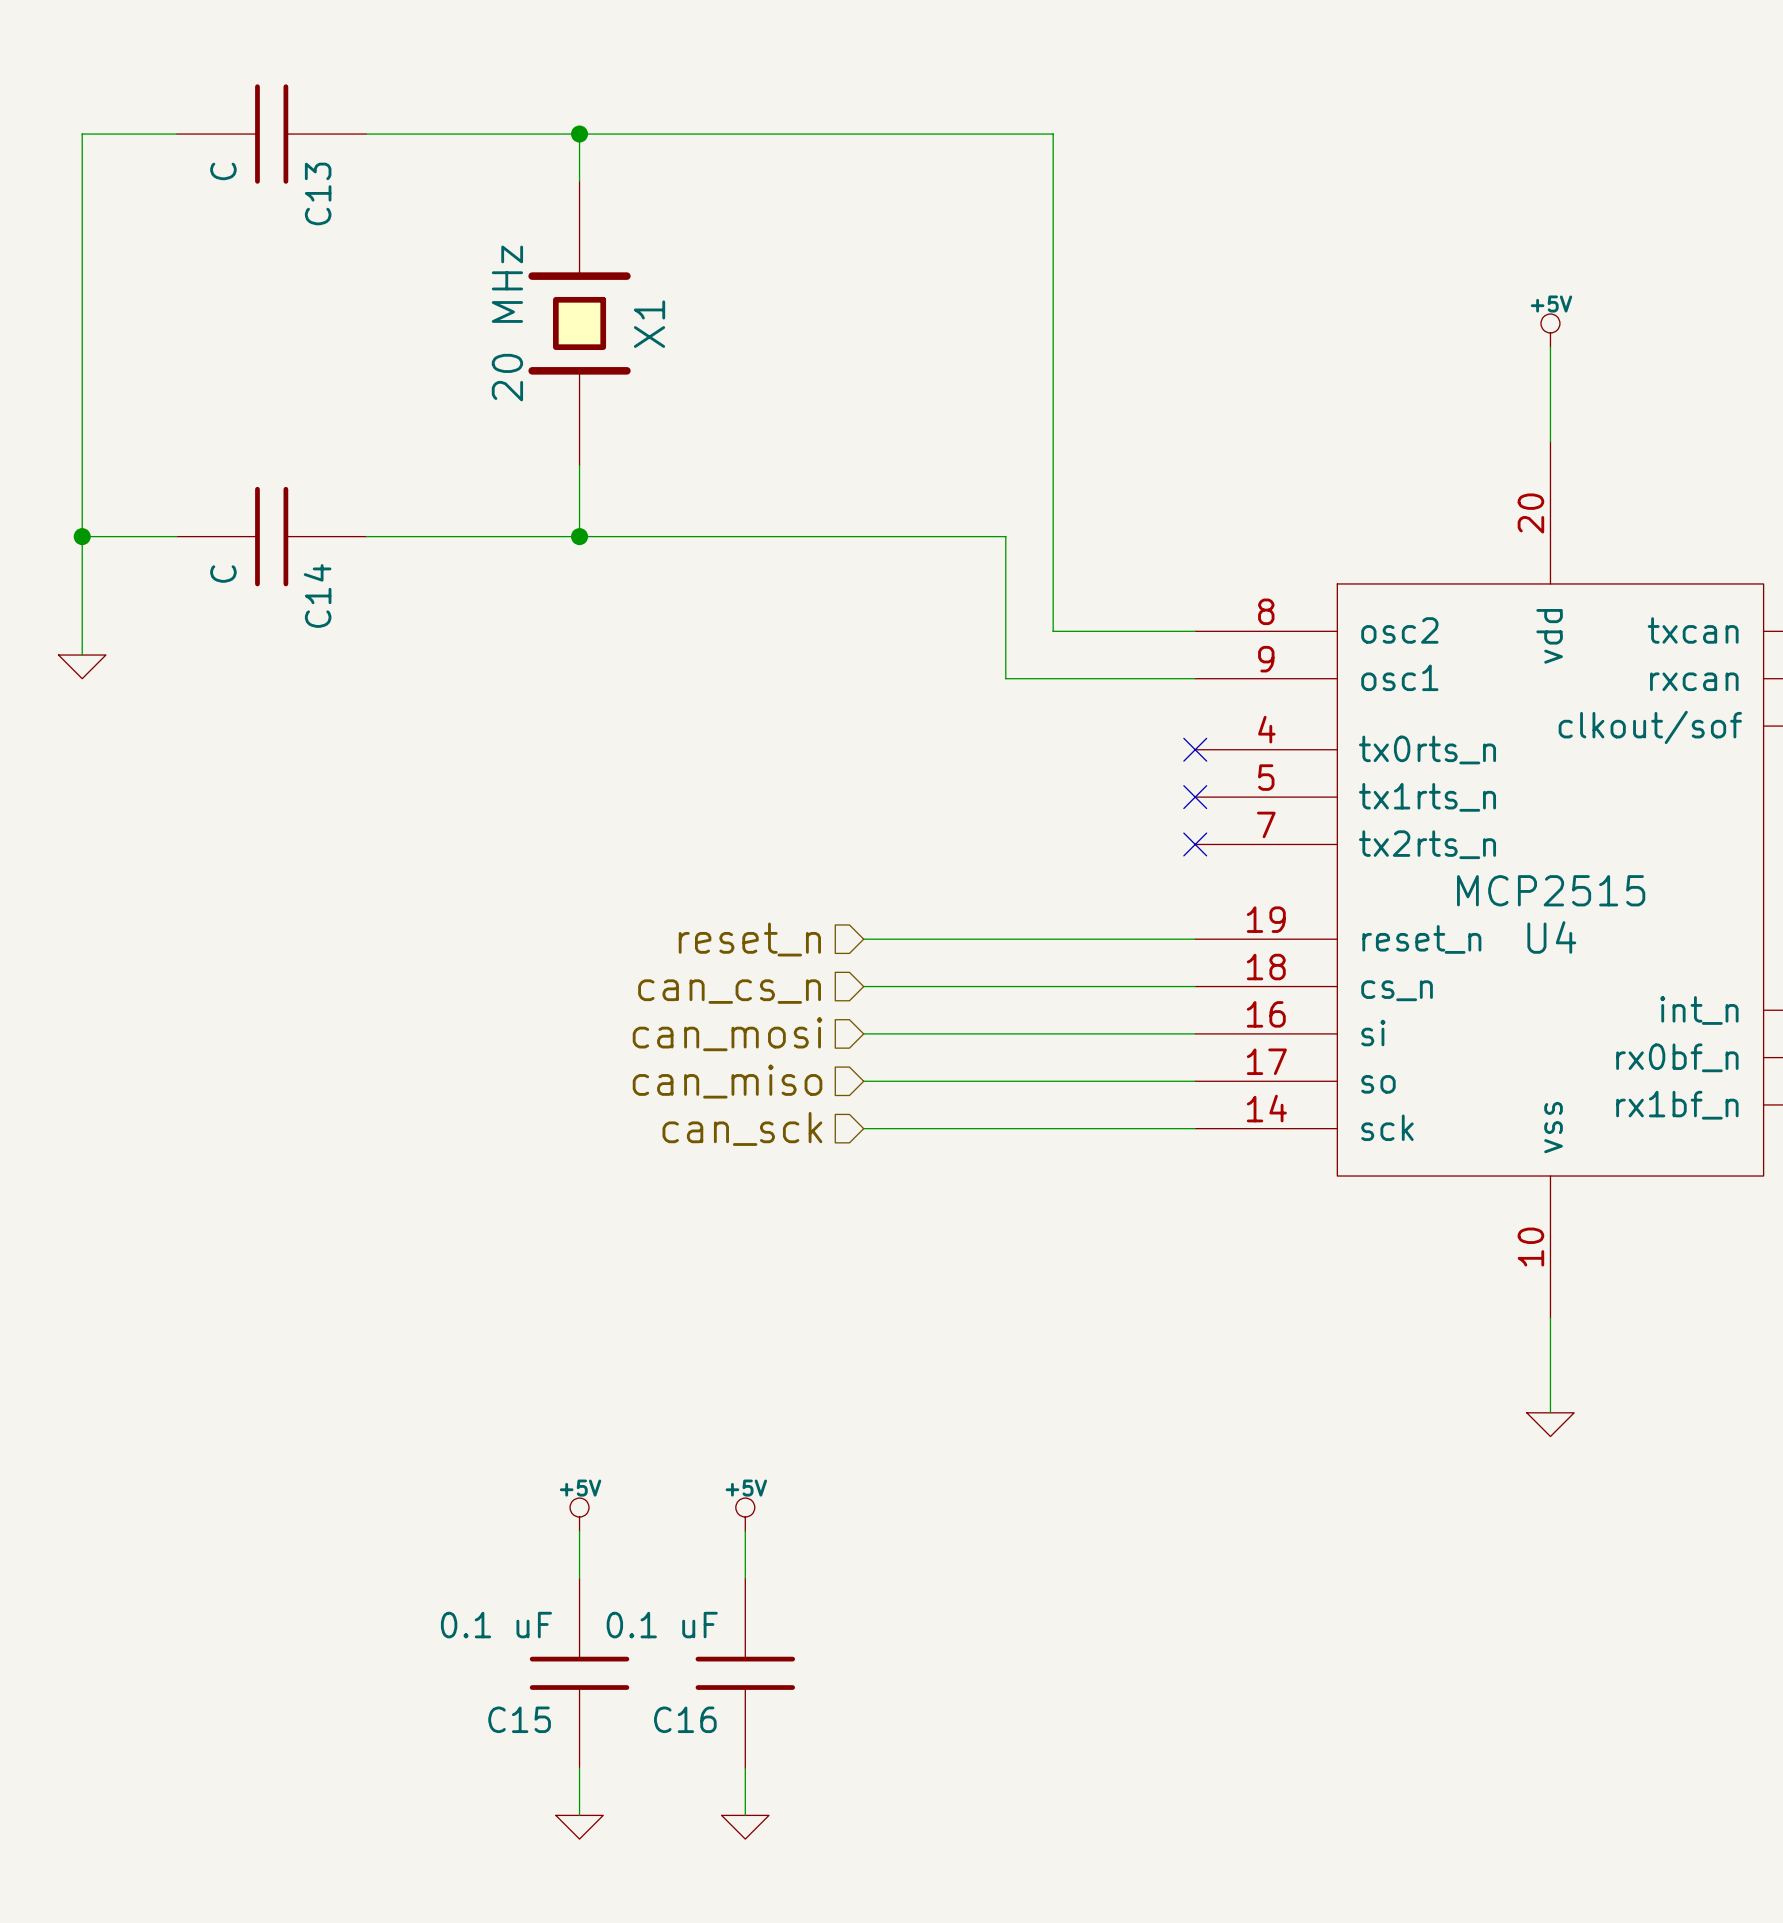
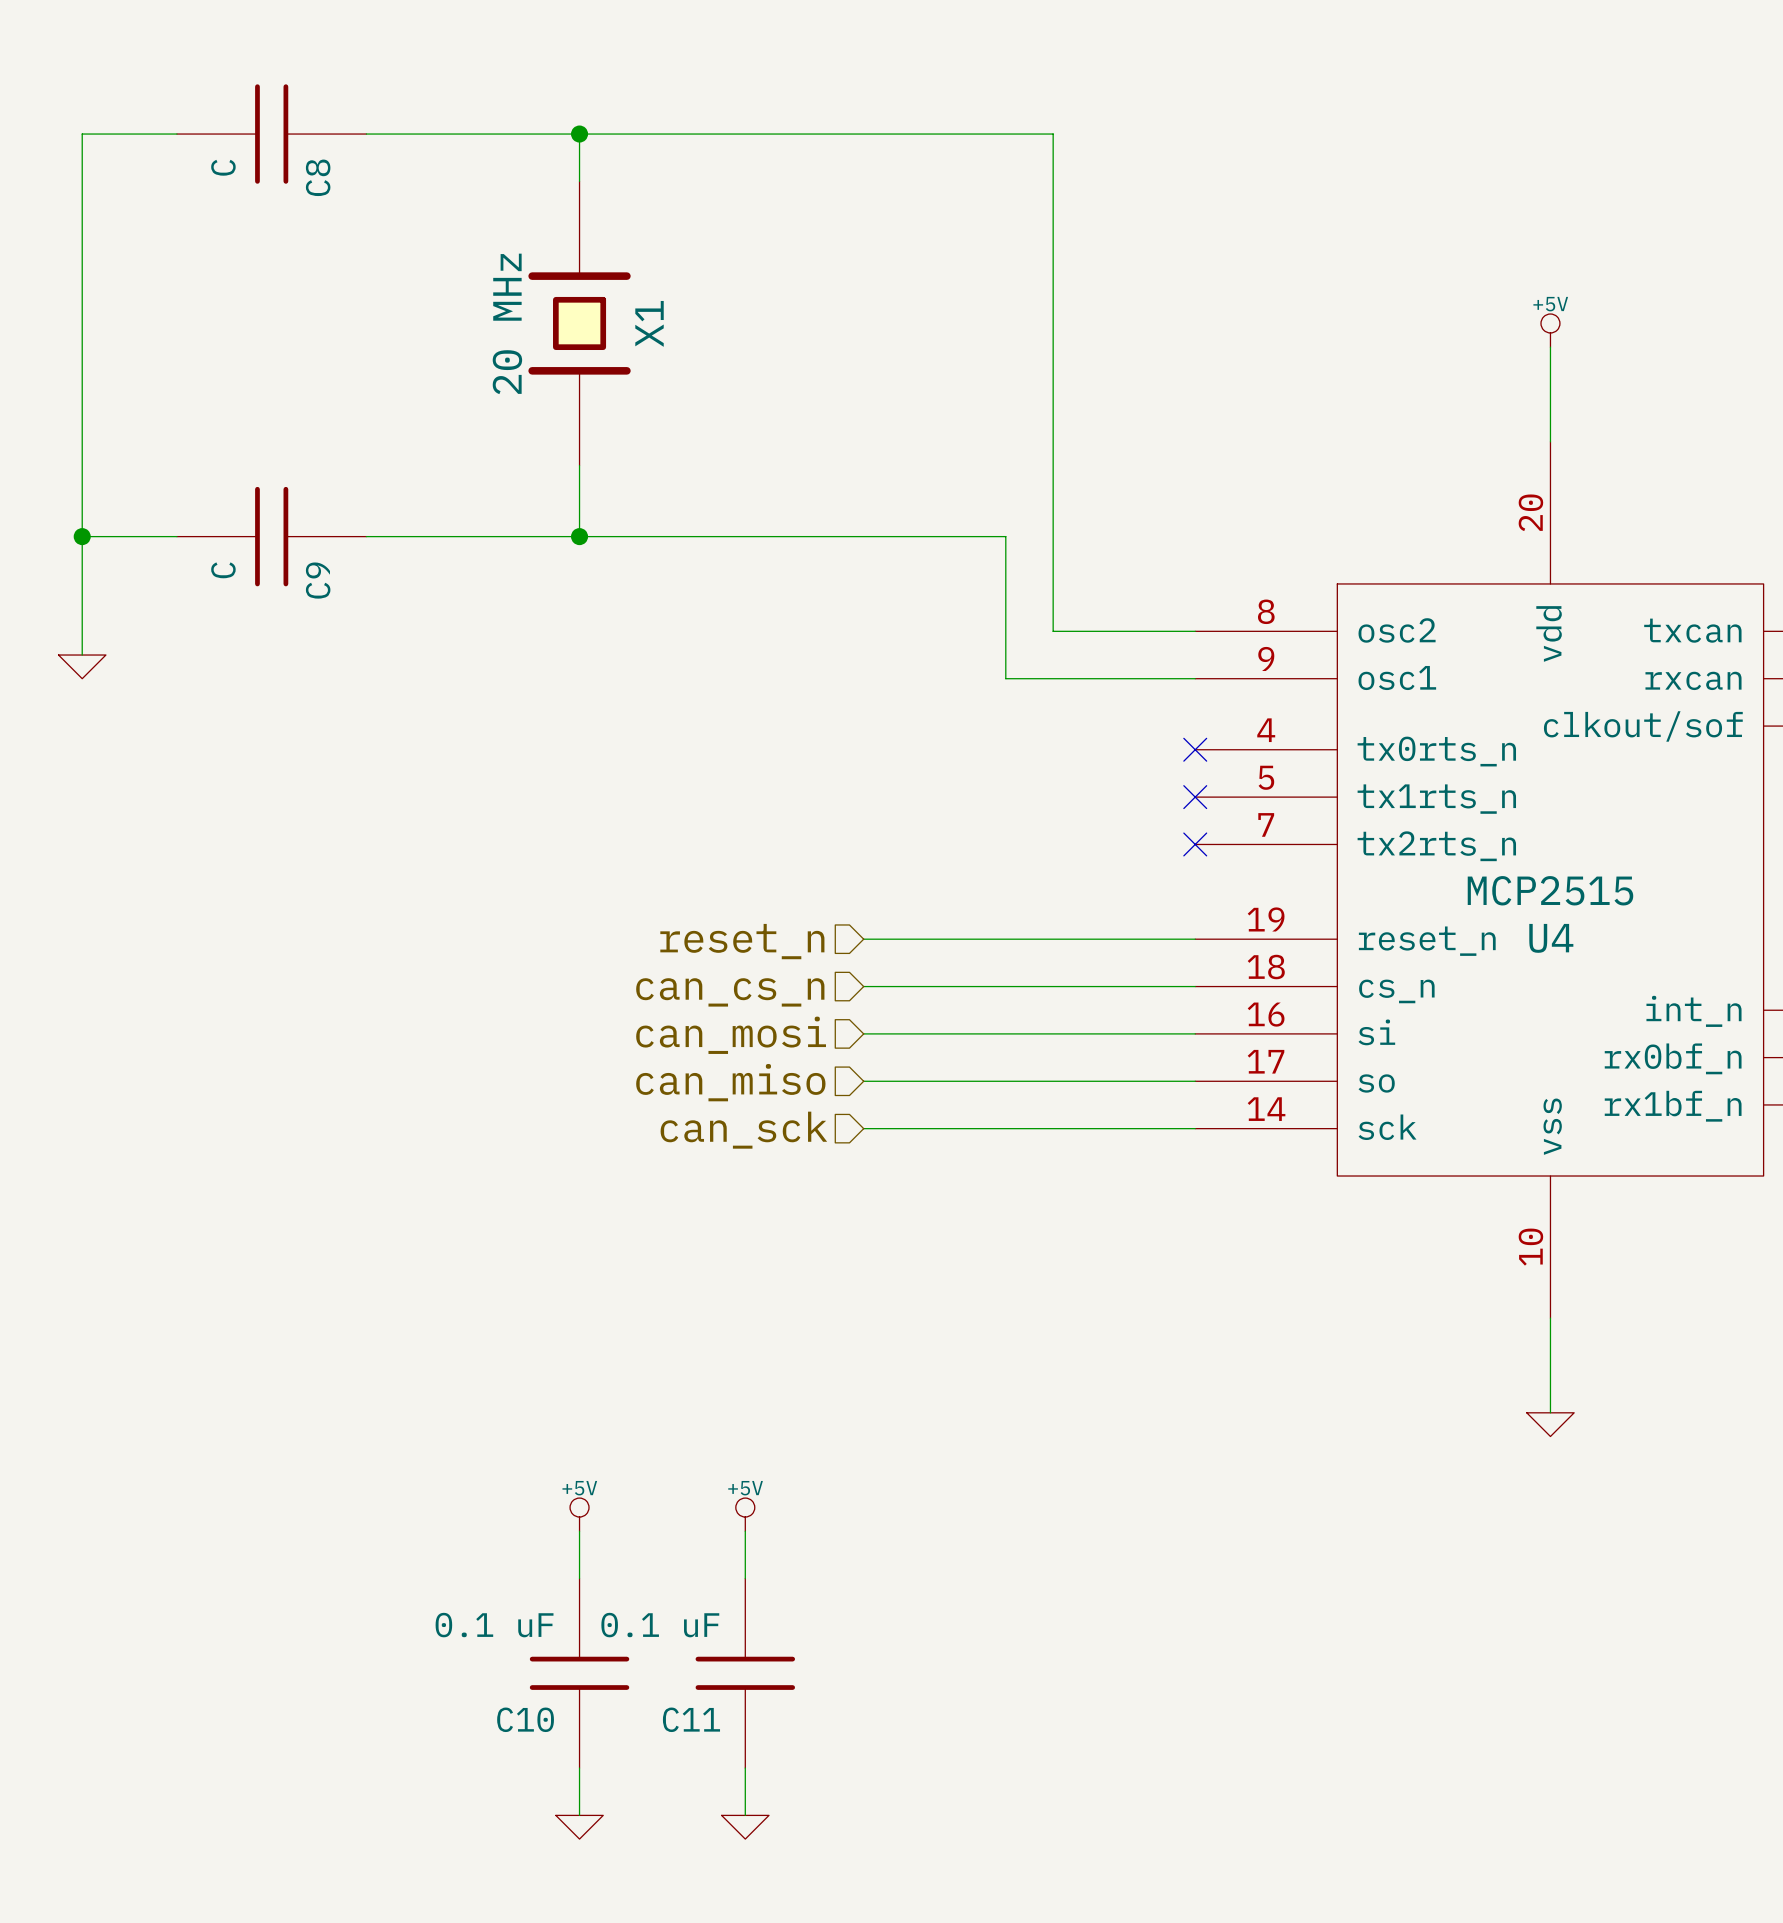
C13 name: C13 (318, 193) -> C8 (318, 177)
C14 name: C14 (317, 595) -> C9 (318, 580)
C15 name: C15 (519, 1719) -> C10 (525, 1719)
C16 name: C16 (685, 1719) -> C11 (691, 1719)

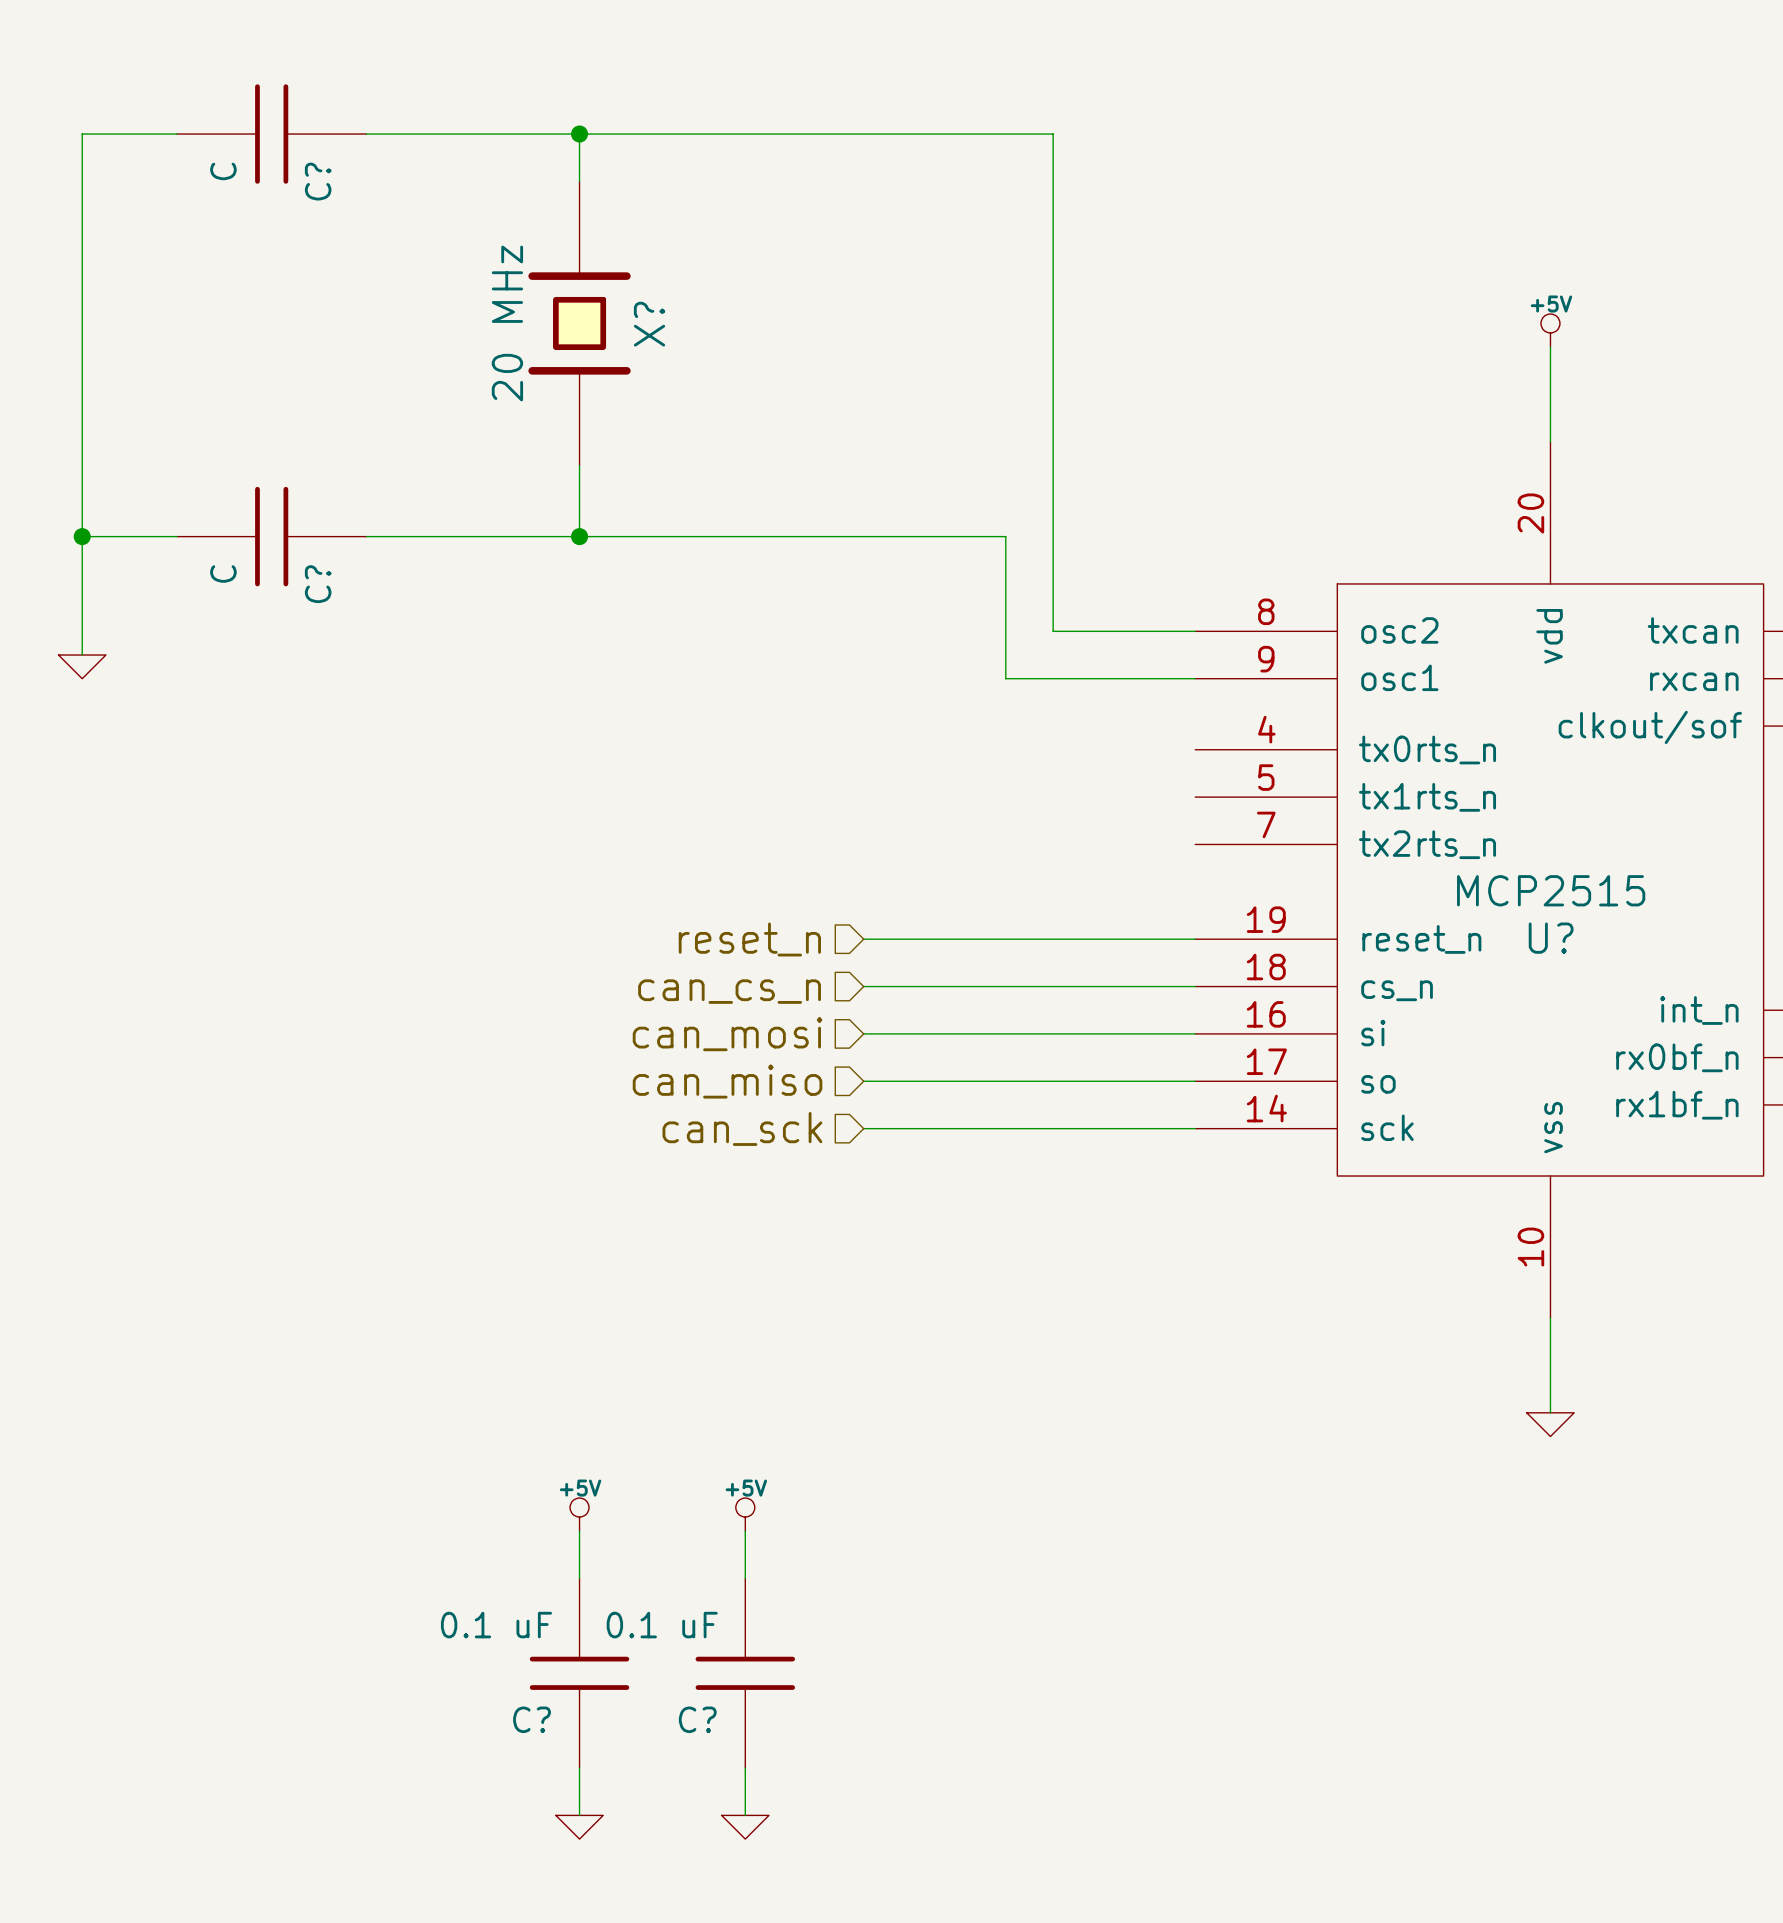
C8 name: C8 (318, 177) -> C? (318, 181)
X1 name: X1 (649, 323) -> X? (649, 324)
C9 name: C9 (318, 580) -> C? (318, 584)
no-connect mark: (1195, 749) -> none
no-connect mark: (1195, 797) -> none
no-connect mark: (1195, 844) -> none
U4 name: U4 (1551, 938) -> U? (1551, 938)
C10 name: C10 (525, 1719) -> C? (531, 1719)
C11 name: C11 (691, 1719) -> C? (697, 1719)

